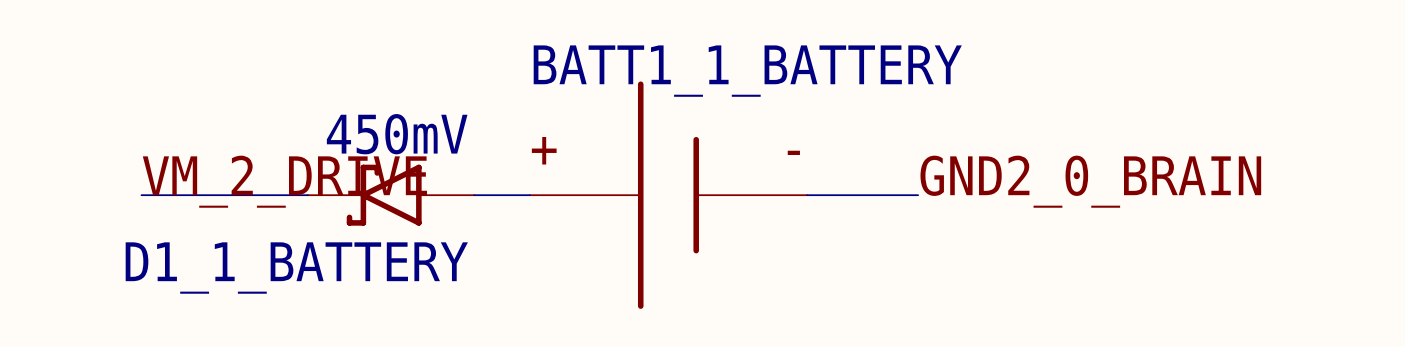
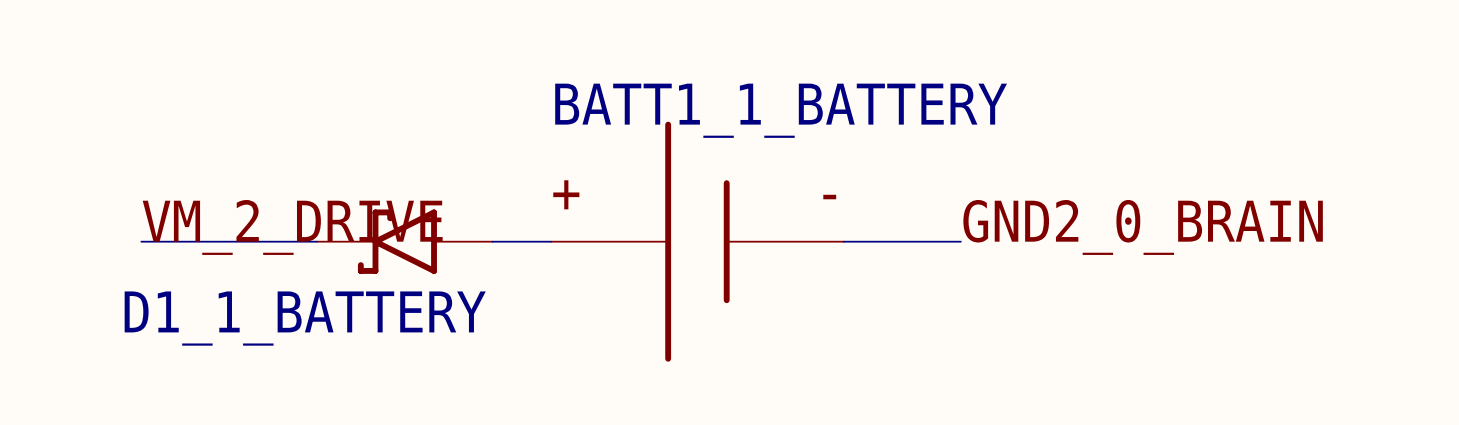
D1_1_BATTERY value: 450mV (397, 134) -> none

